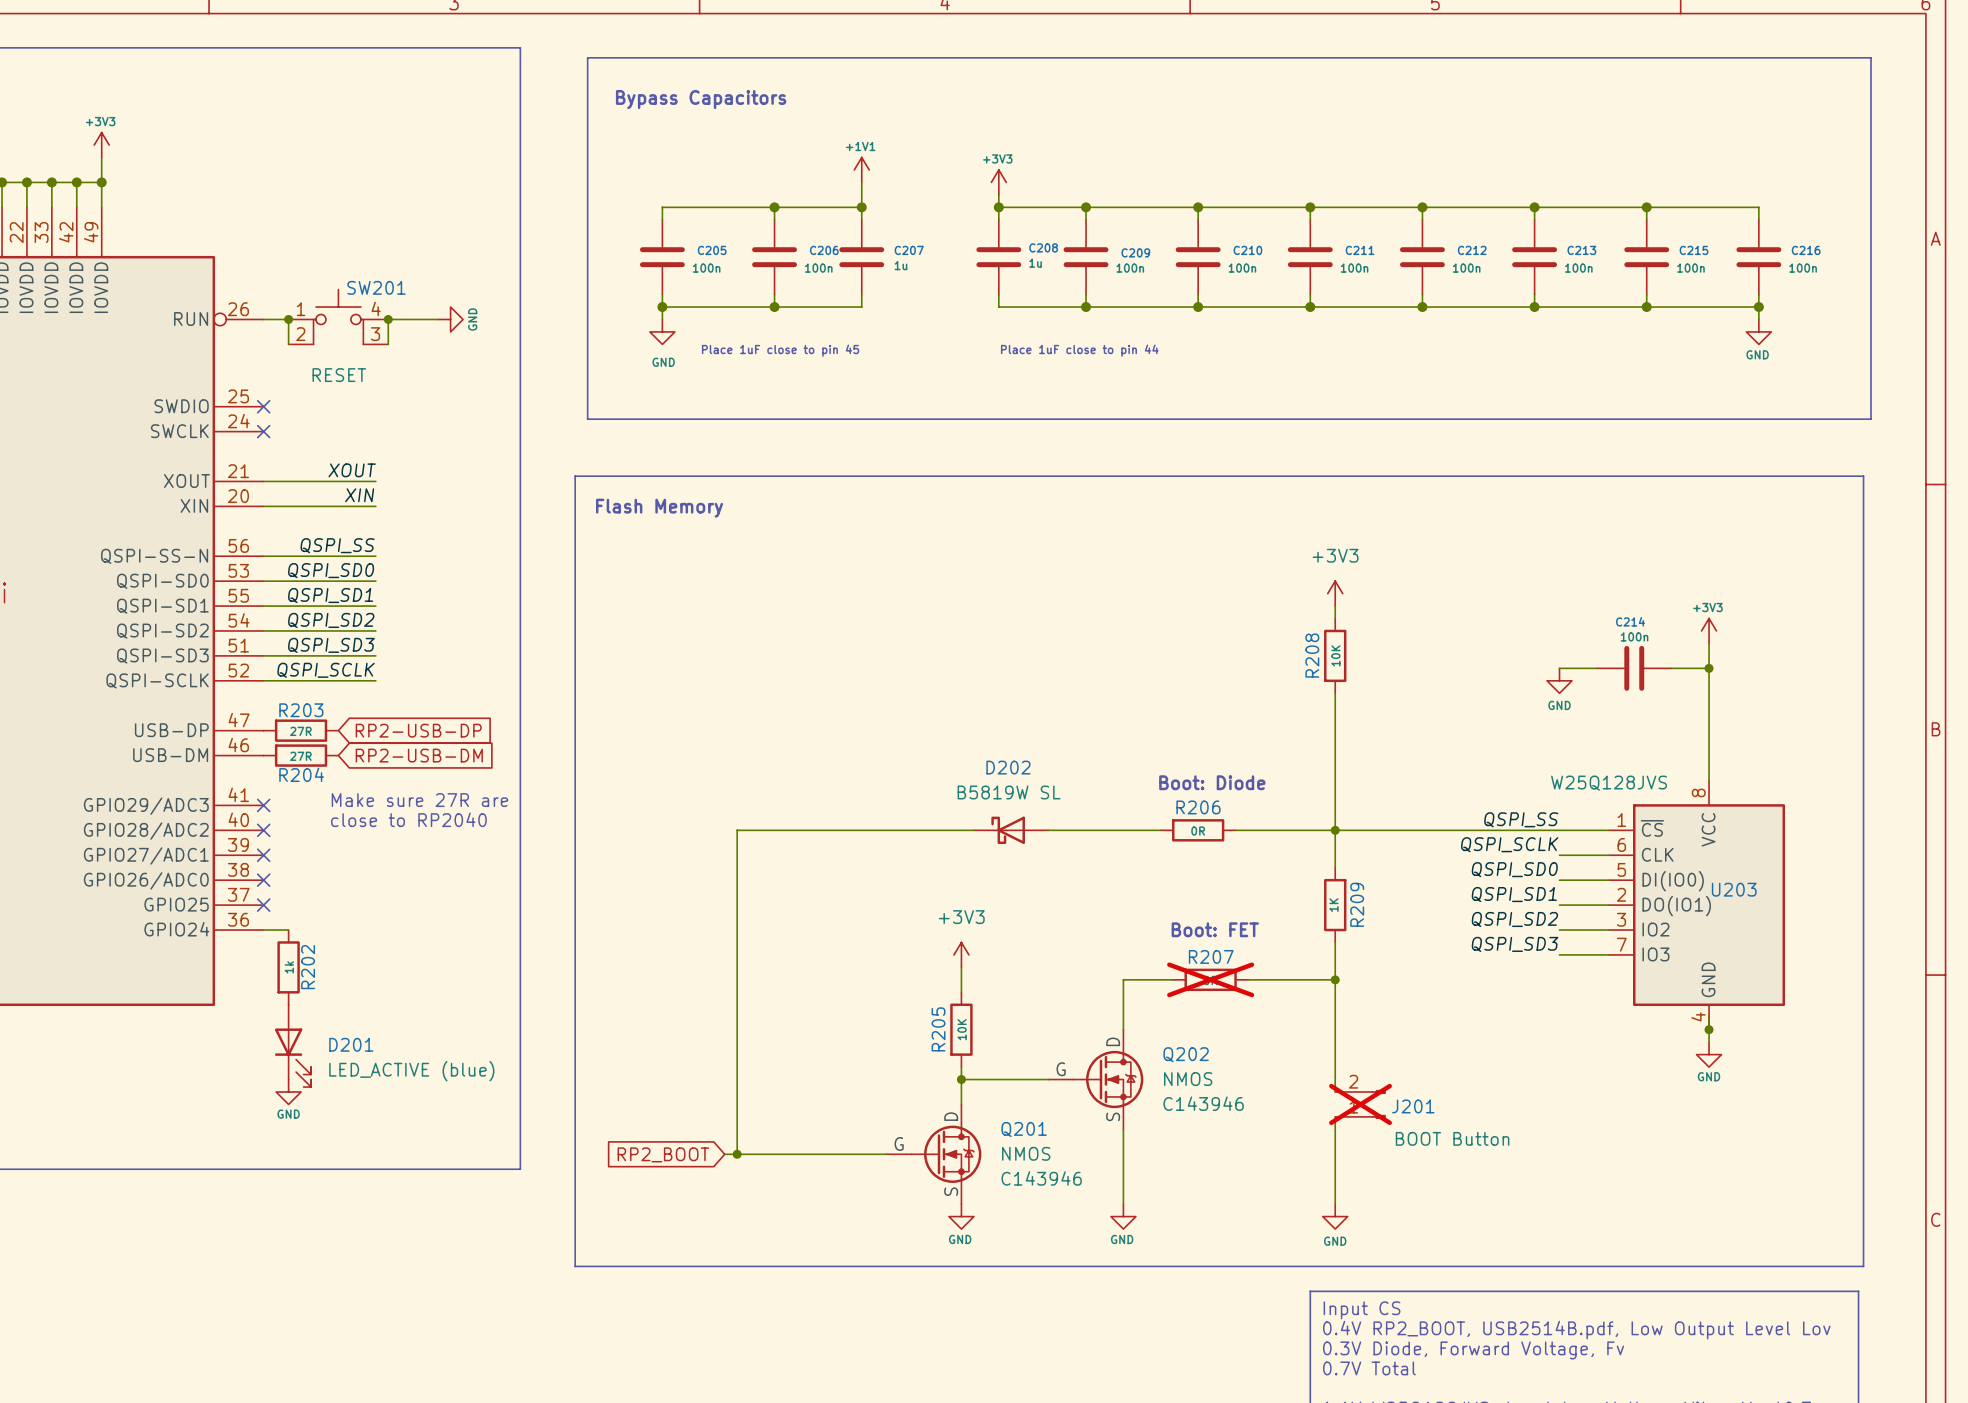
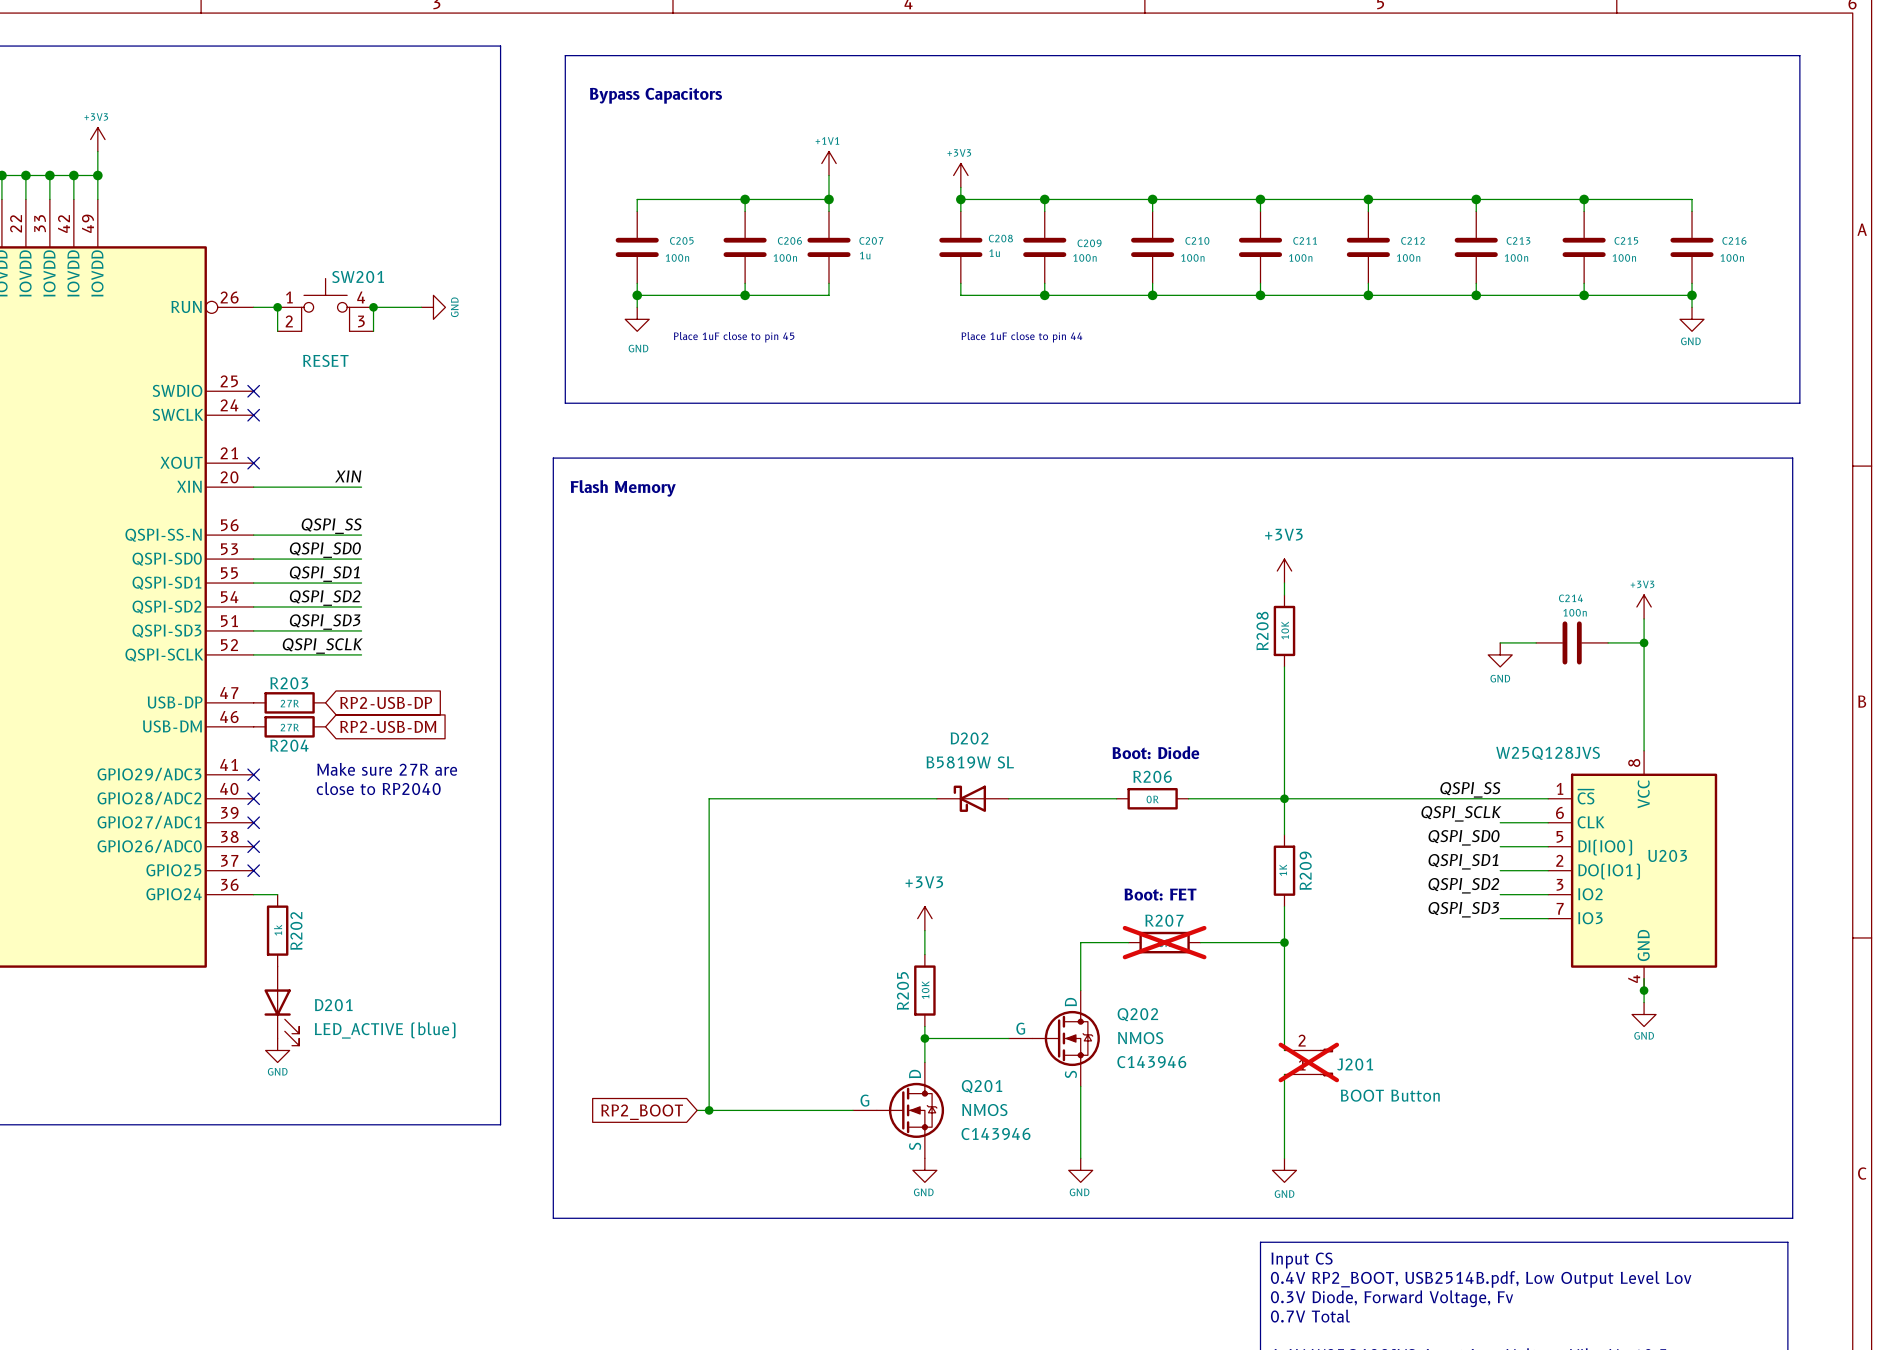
label: XOUT (352, 470) -> none
wire: (263, 481) (375, 481) -> none
no-connect mark: none -> (253, 463)

